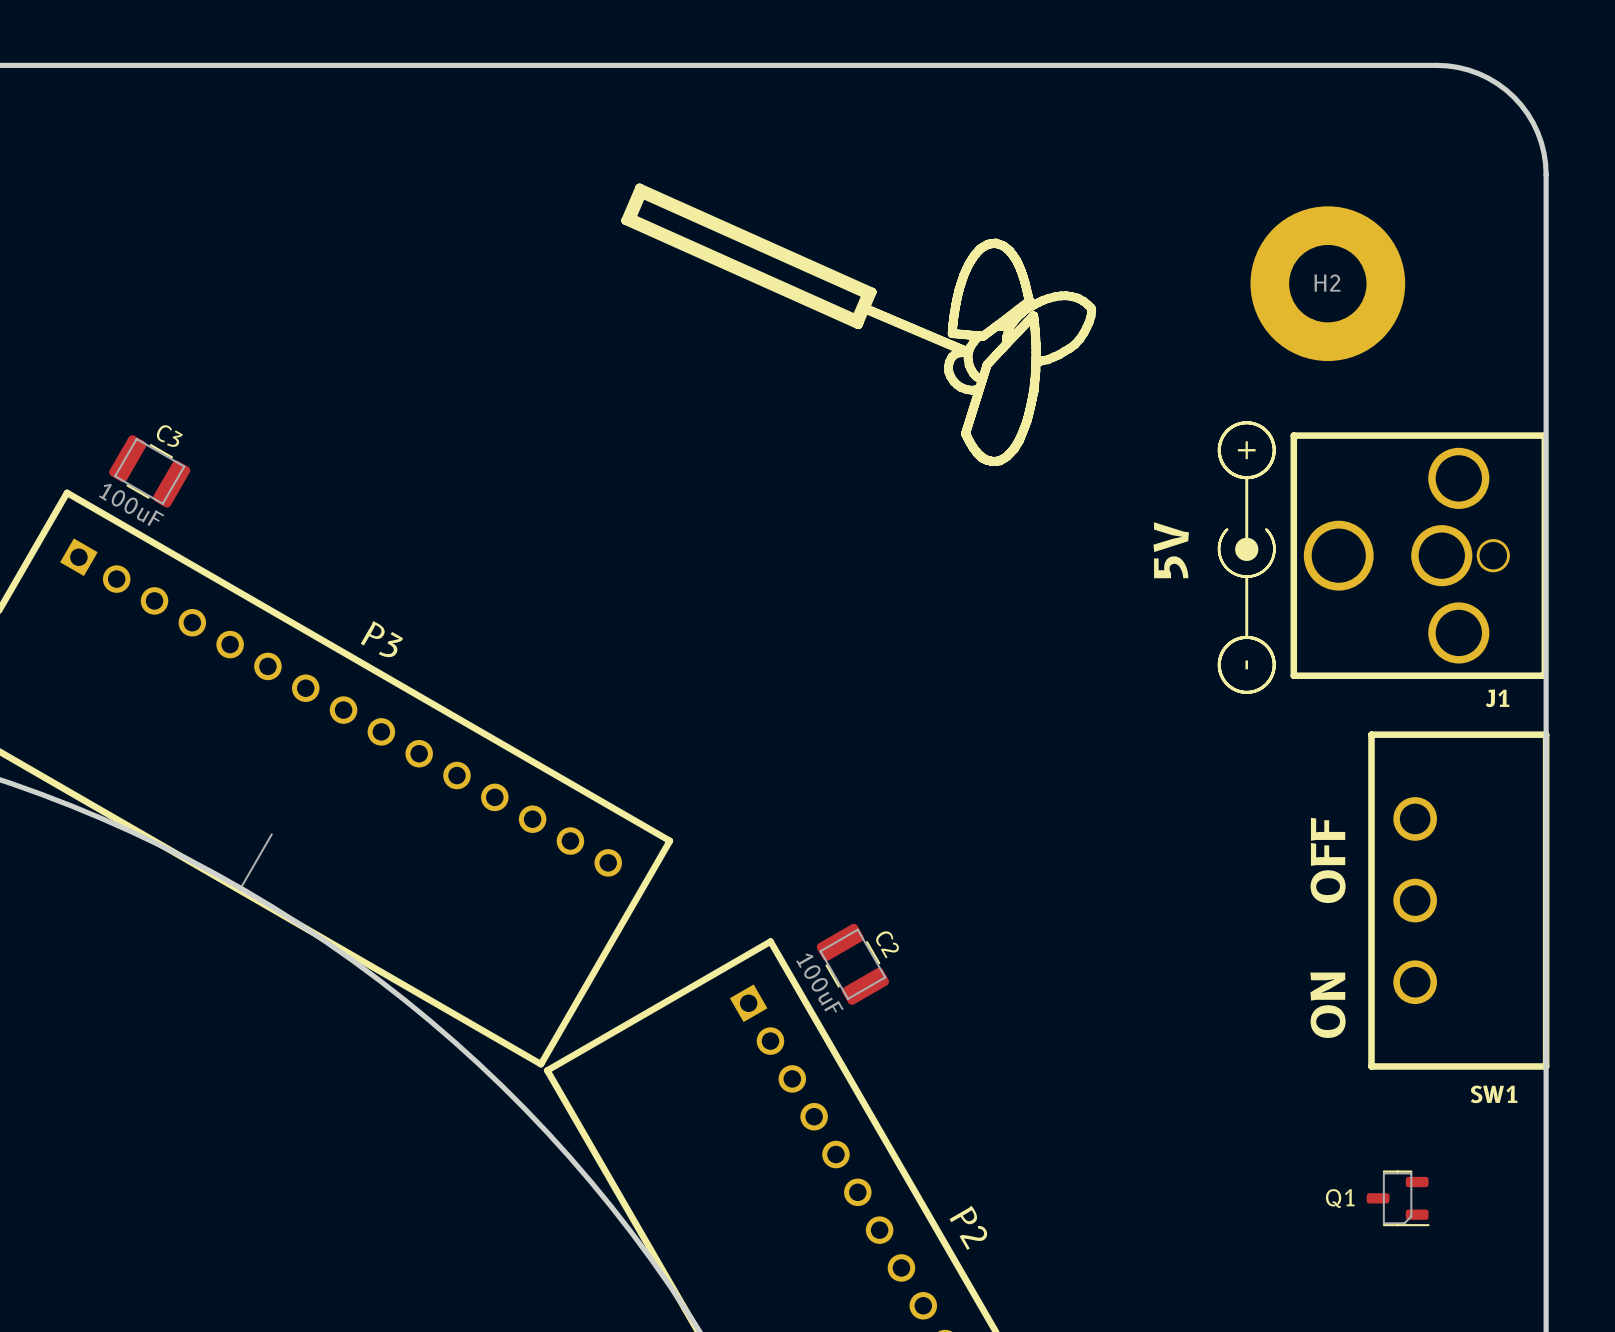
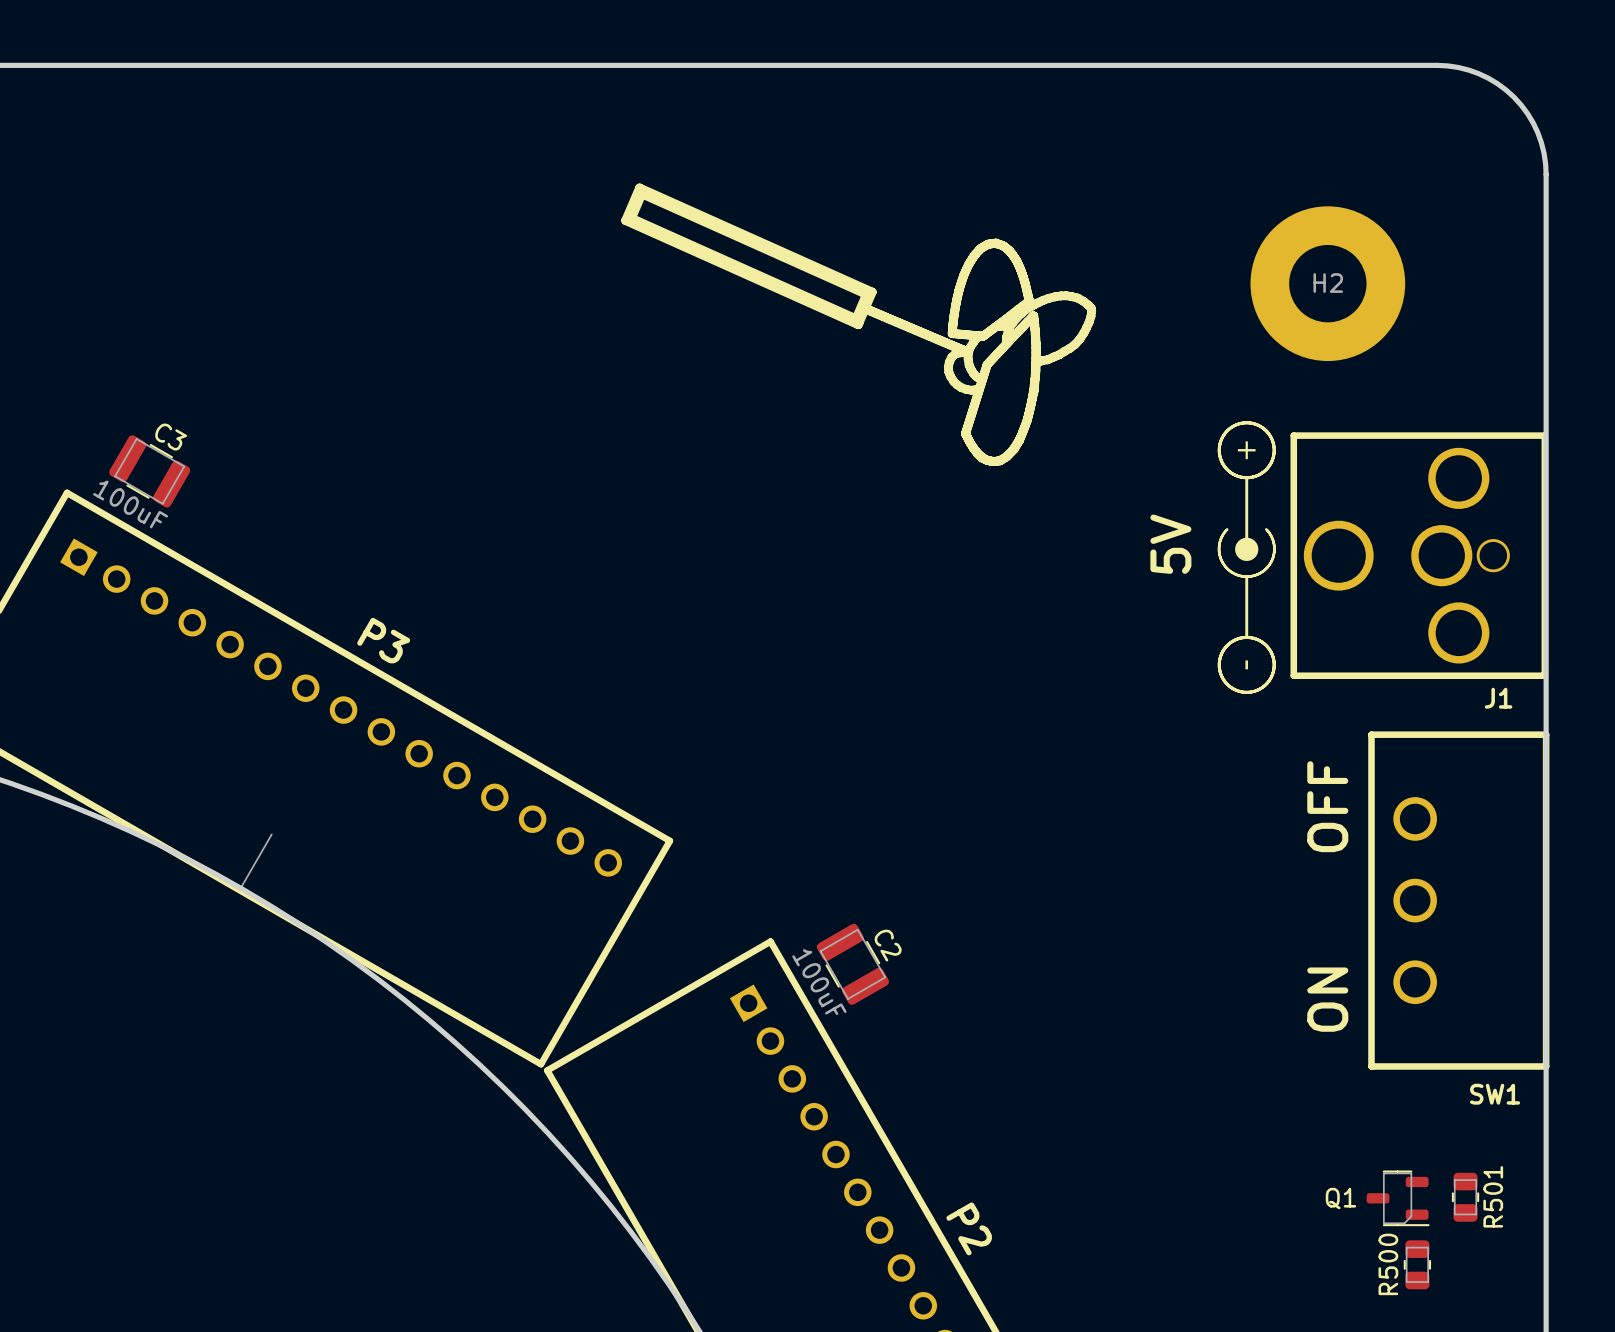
R501: none -> (1465, 1197)
R500: none -> (1417, 1264)

